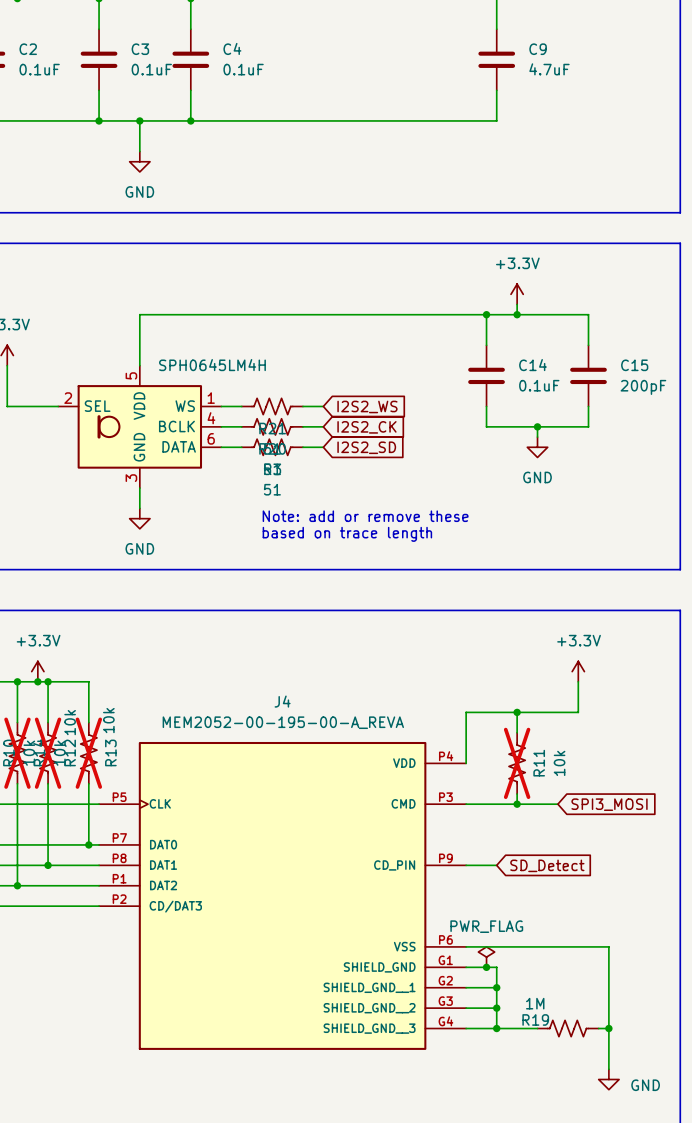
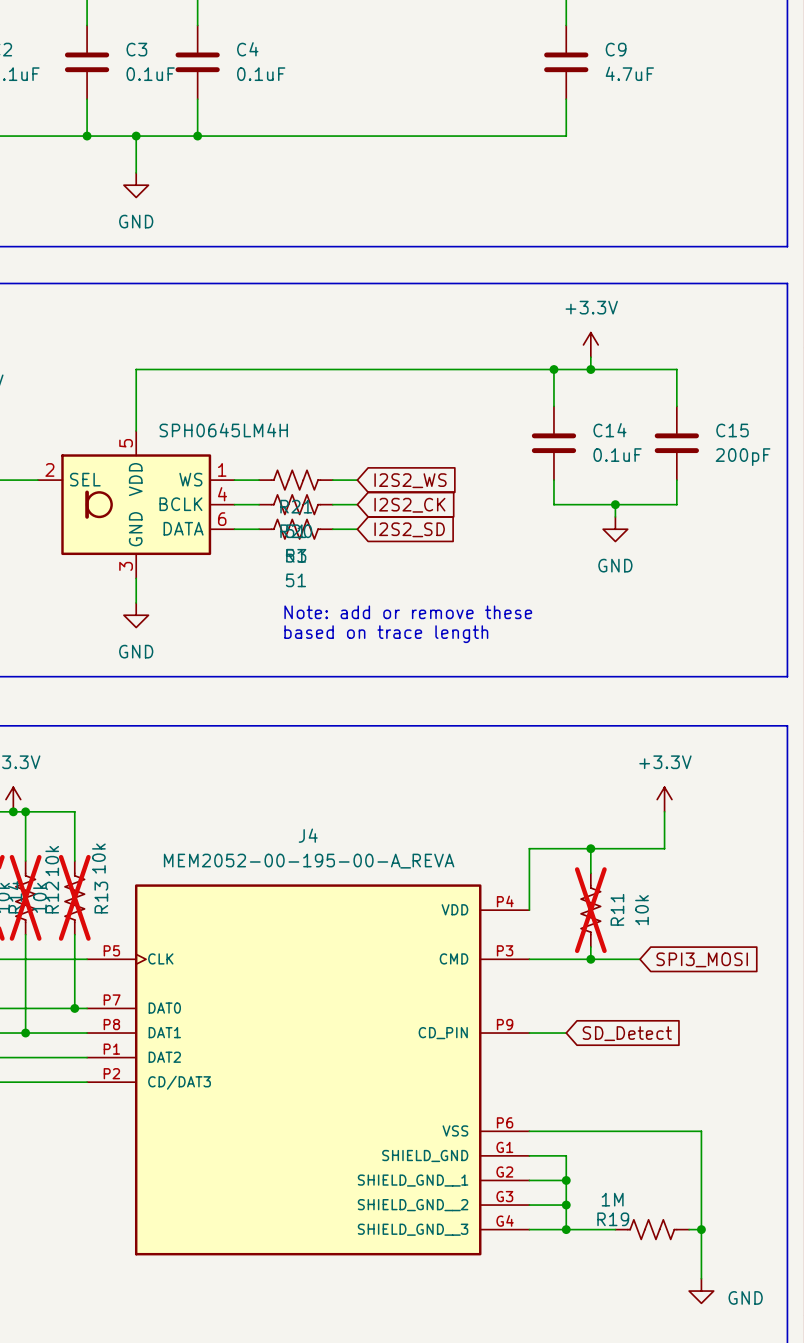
power symbol: PWR_FLAG (486, 957) -> none
junction: (486, 967) -> none

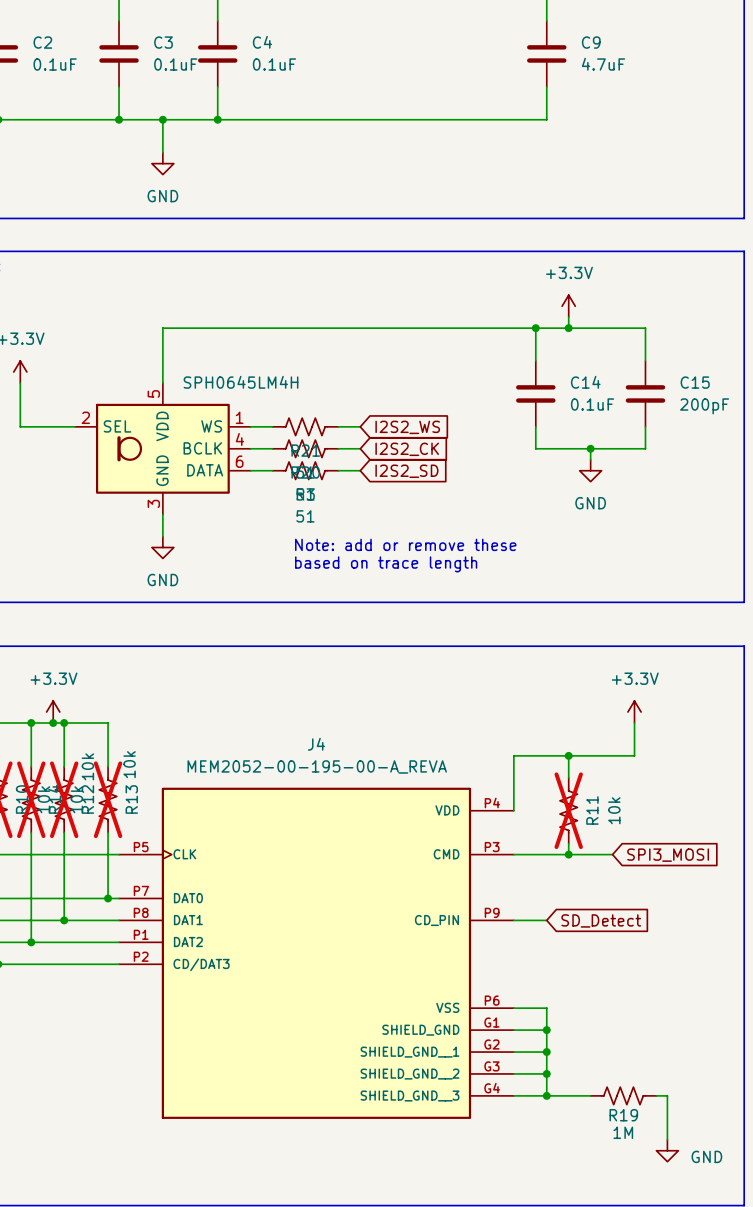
wire: (566, 1131) (701, 1131) (701, 1229) -> (546, 1008) (546, 1030)
junction: none -> (546, 1030)
R19 value position: 1M (612, 1199) -> 1M (623, 1132)
R19 name position: R19 (613, 1219) -> R19 (623, 1115)
junction: (701, 1229) -> none

